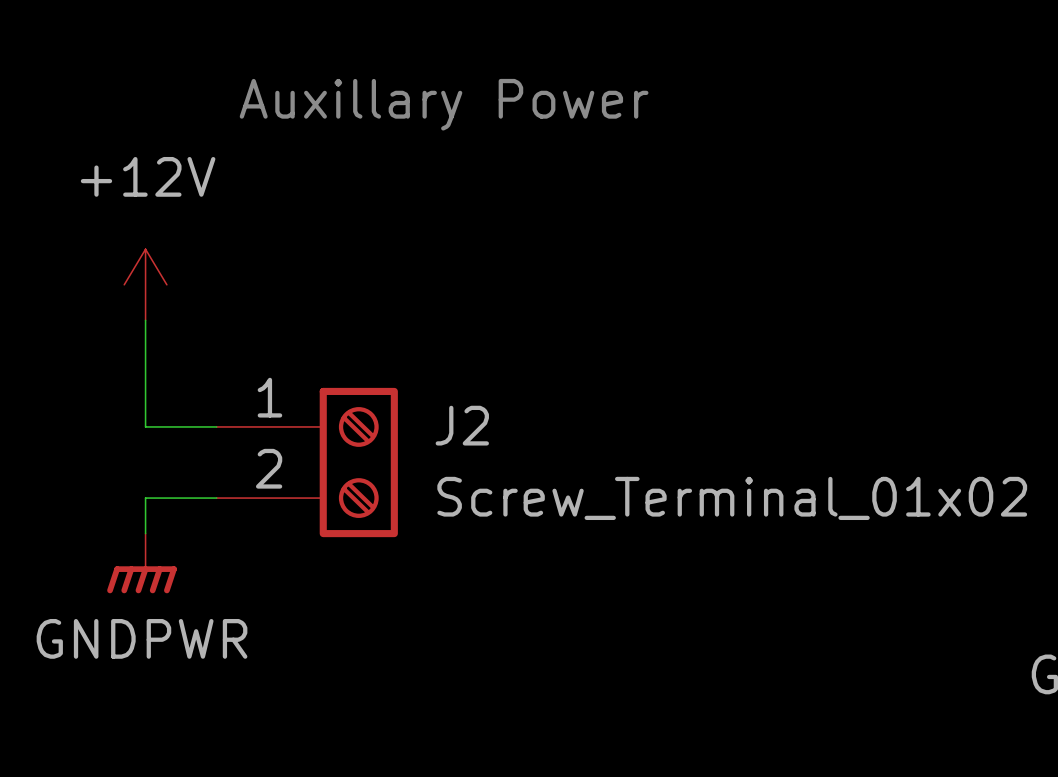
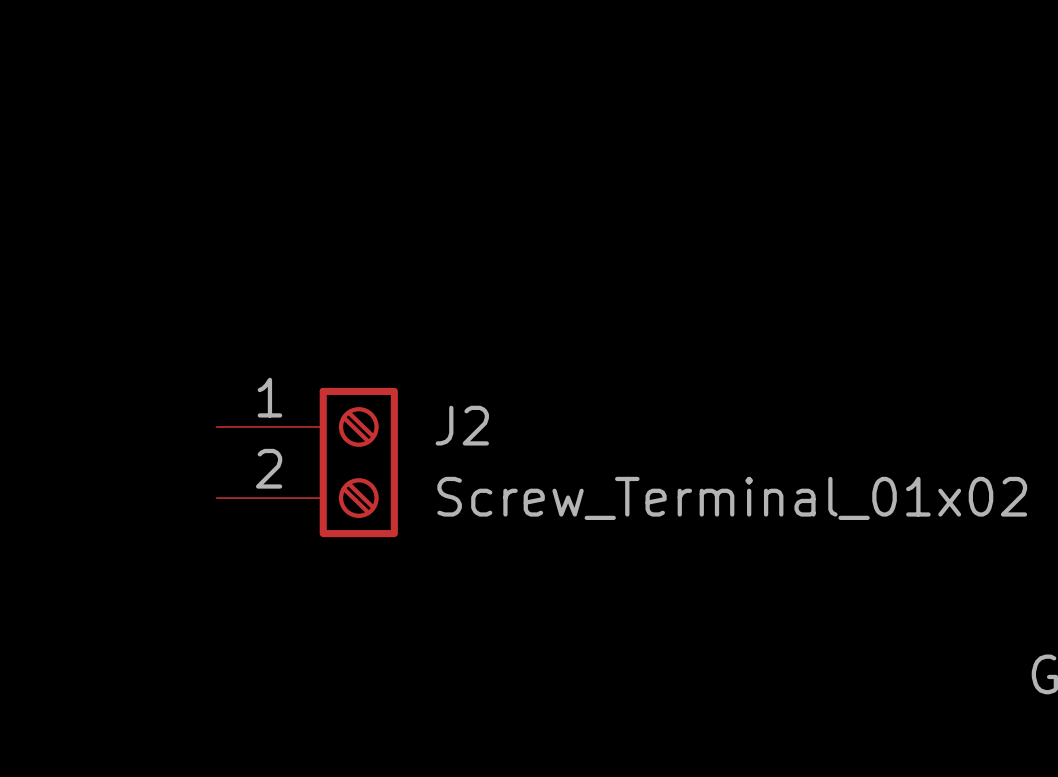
text: Auxillary Power (444, 104) -> none
power symbol: +12V (145, 284) -> none
wire: (145, 320) (145, 426) (216, 426) -> none
wire: (216, 498) (145, 498) (145, 533) -> none
power symbol: GNDPWR (142, 563) -> none

